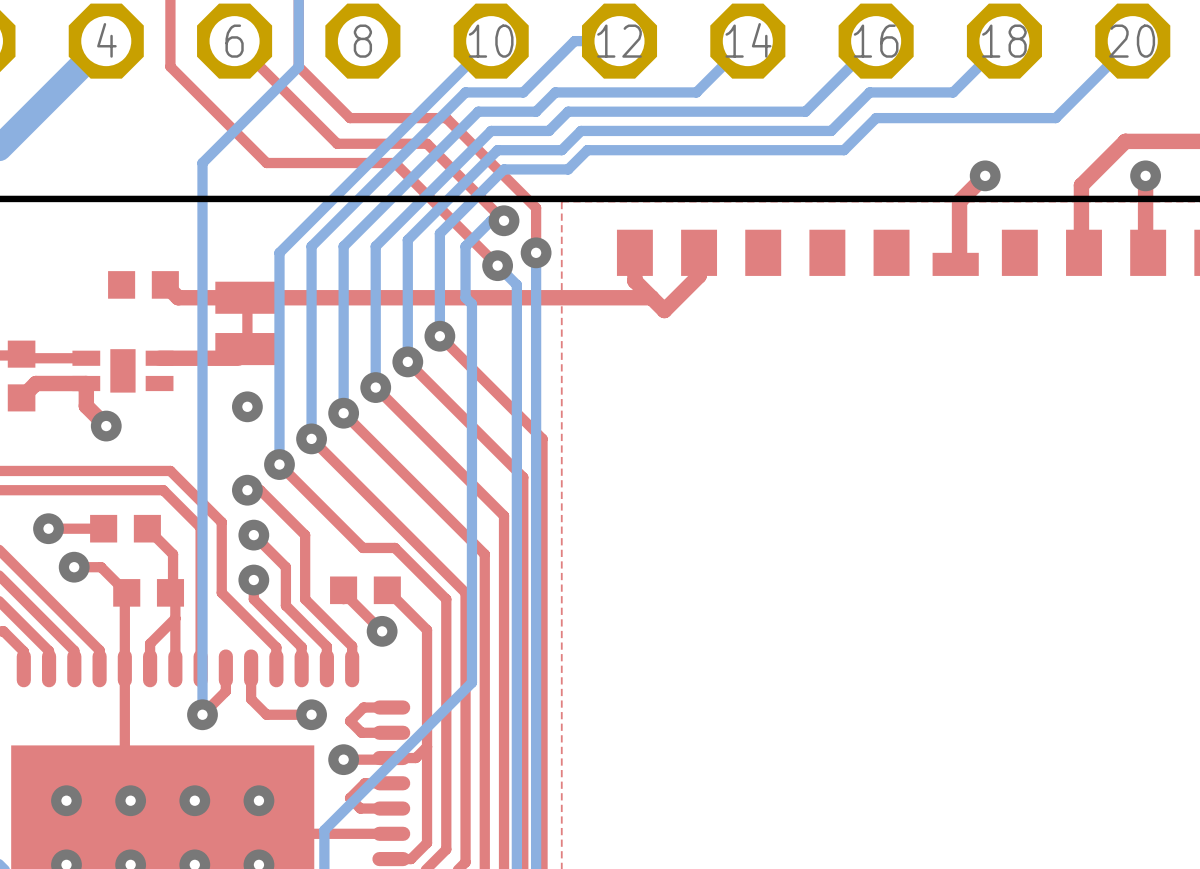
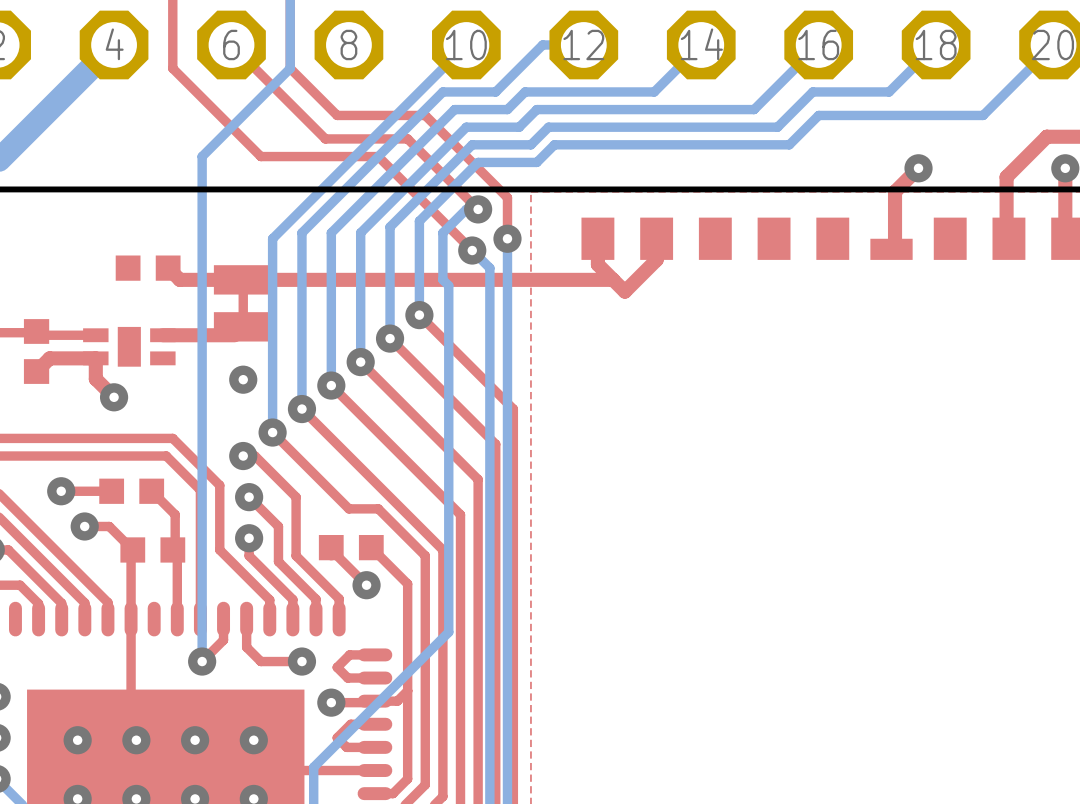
top track: (175, 618) (150, 643) (150, 668) -> none

